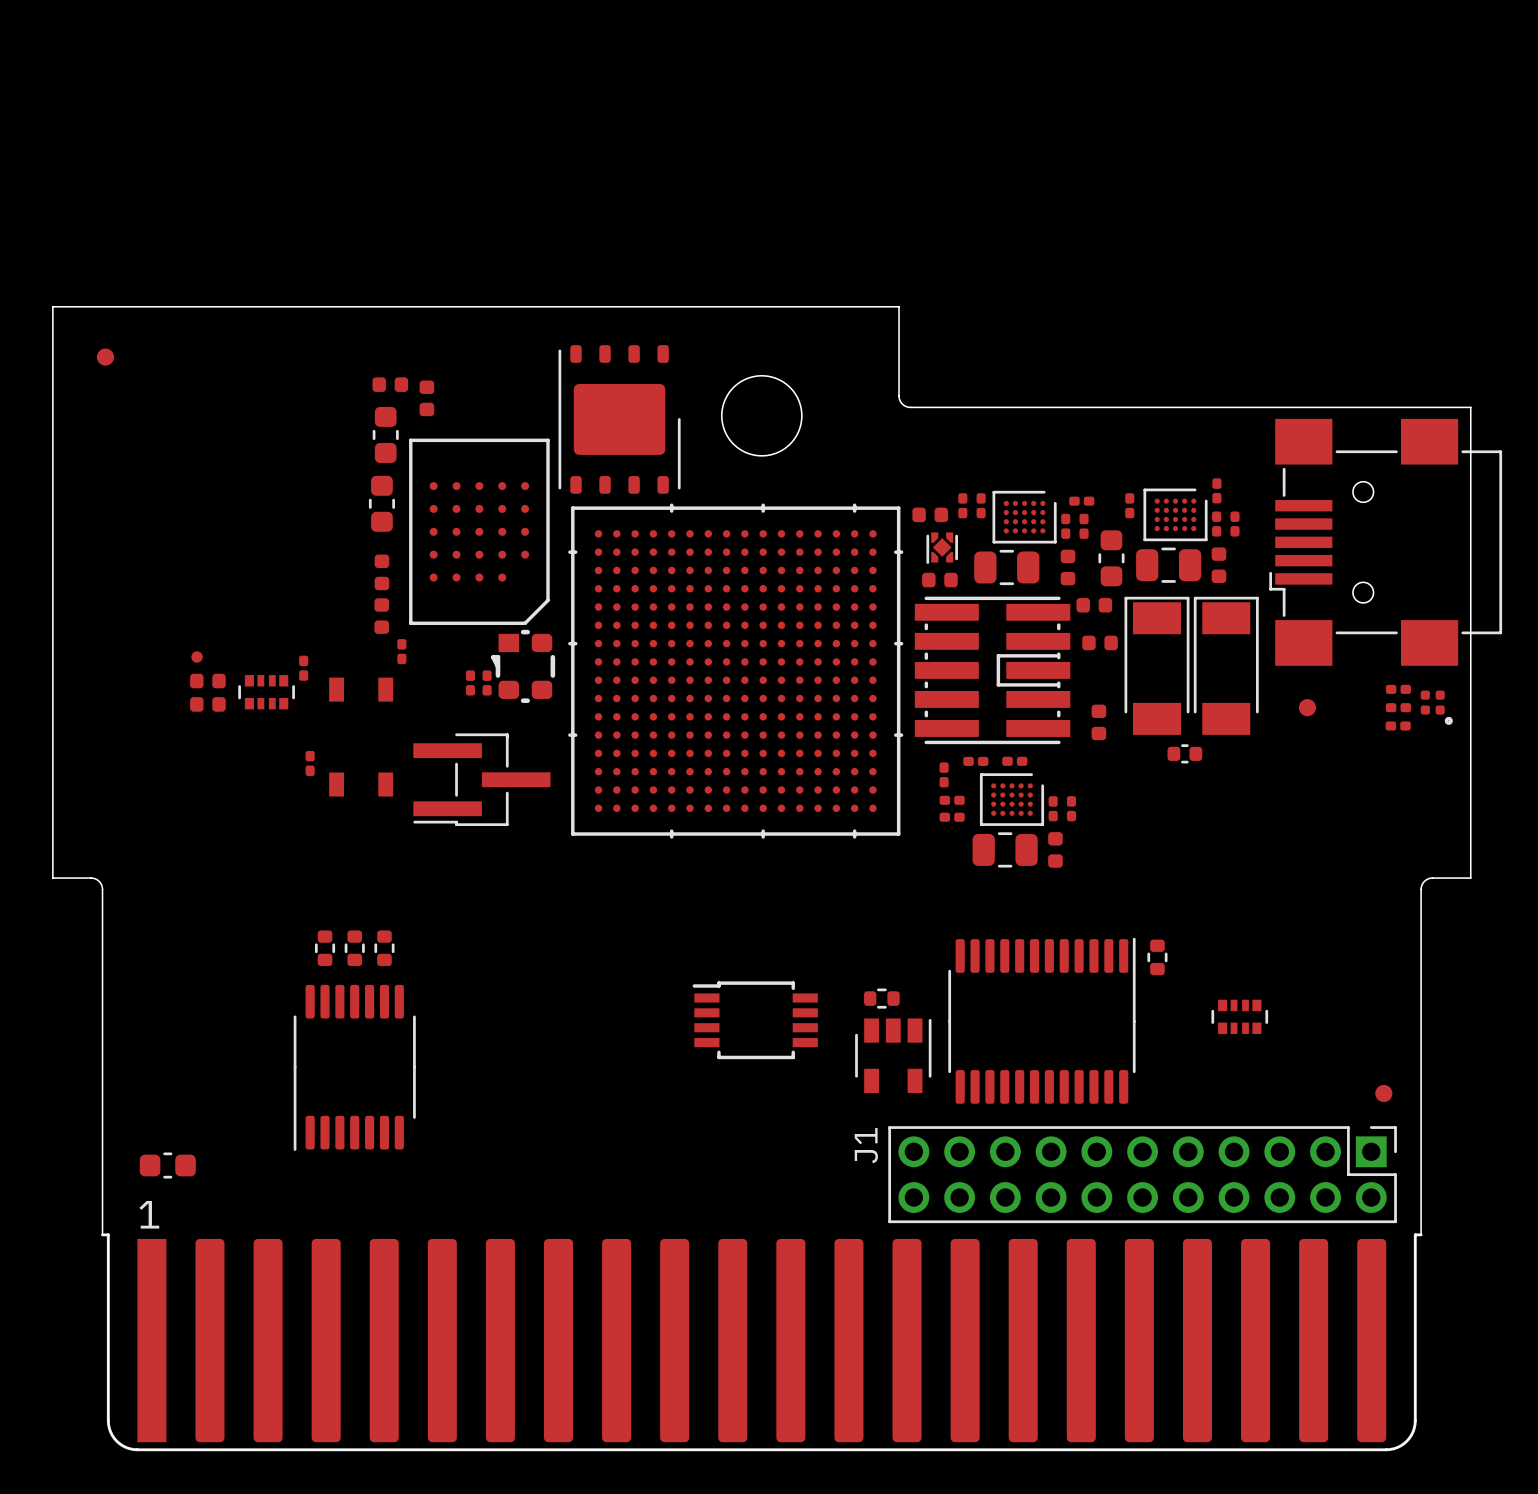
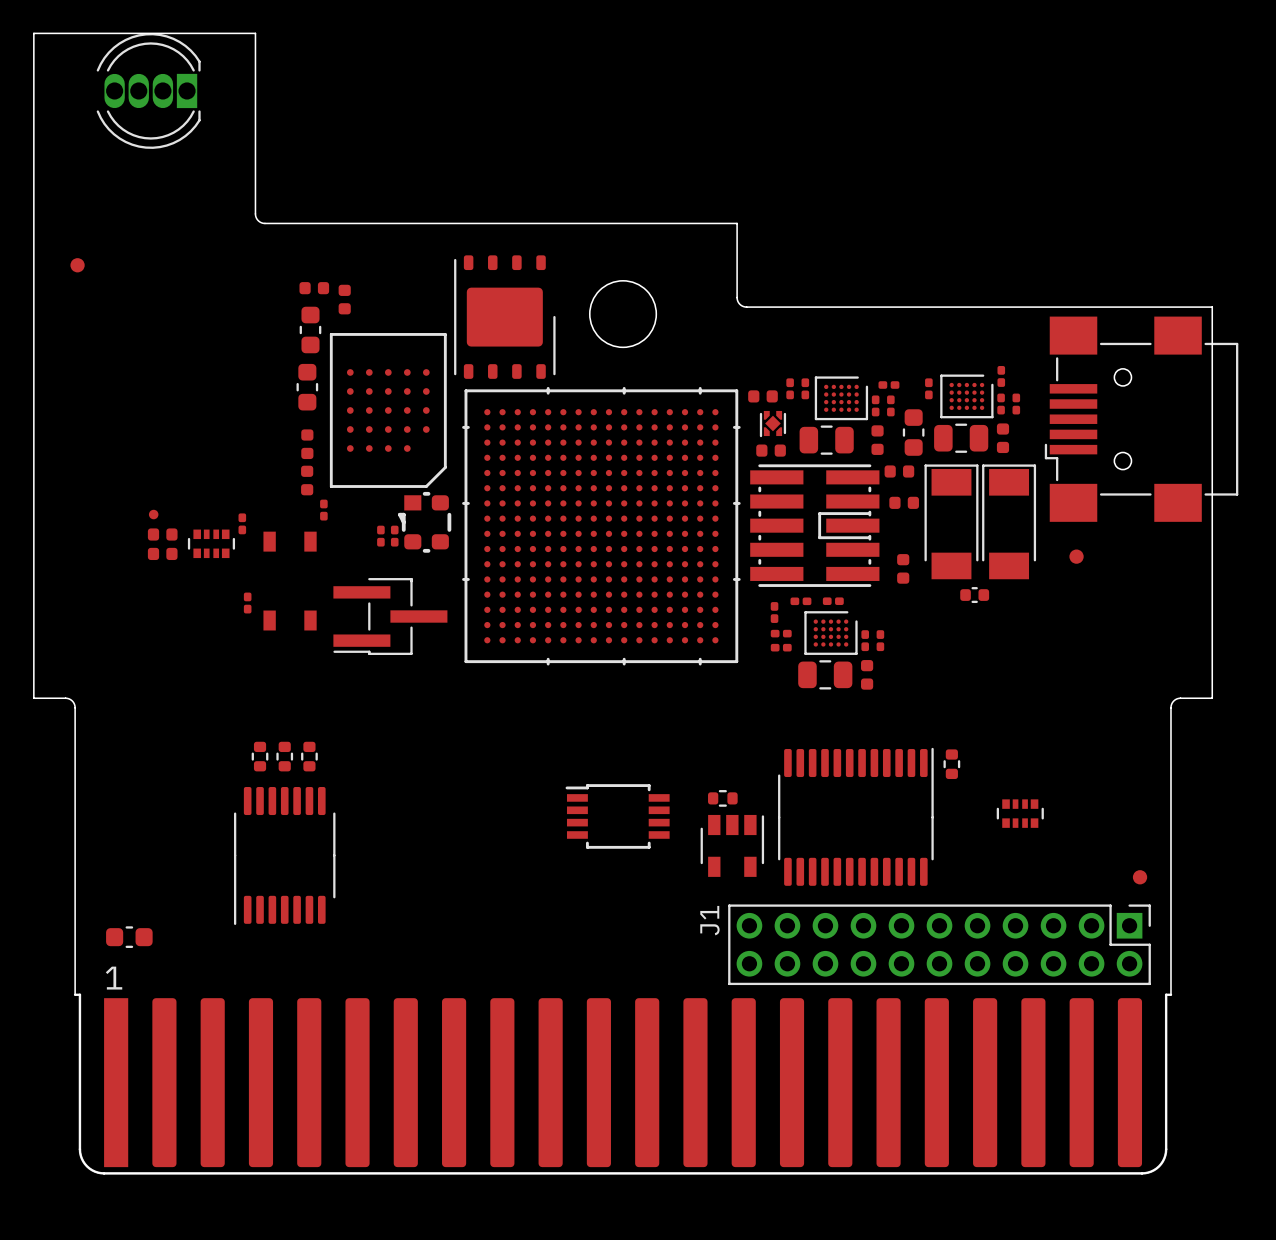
part: none -> (148, 90)
board edge: (52, 306) (330, 306) -> (33, 223) (33, 33) (255, 33) (255, 213) (258, 220) (264, 223)
part: (1398, 689) -> none
part: (1398, 707) -> none
part: (1436, 707) -> none
part: (1398, 725) -> none

